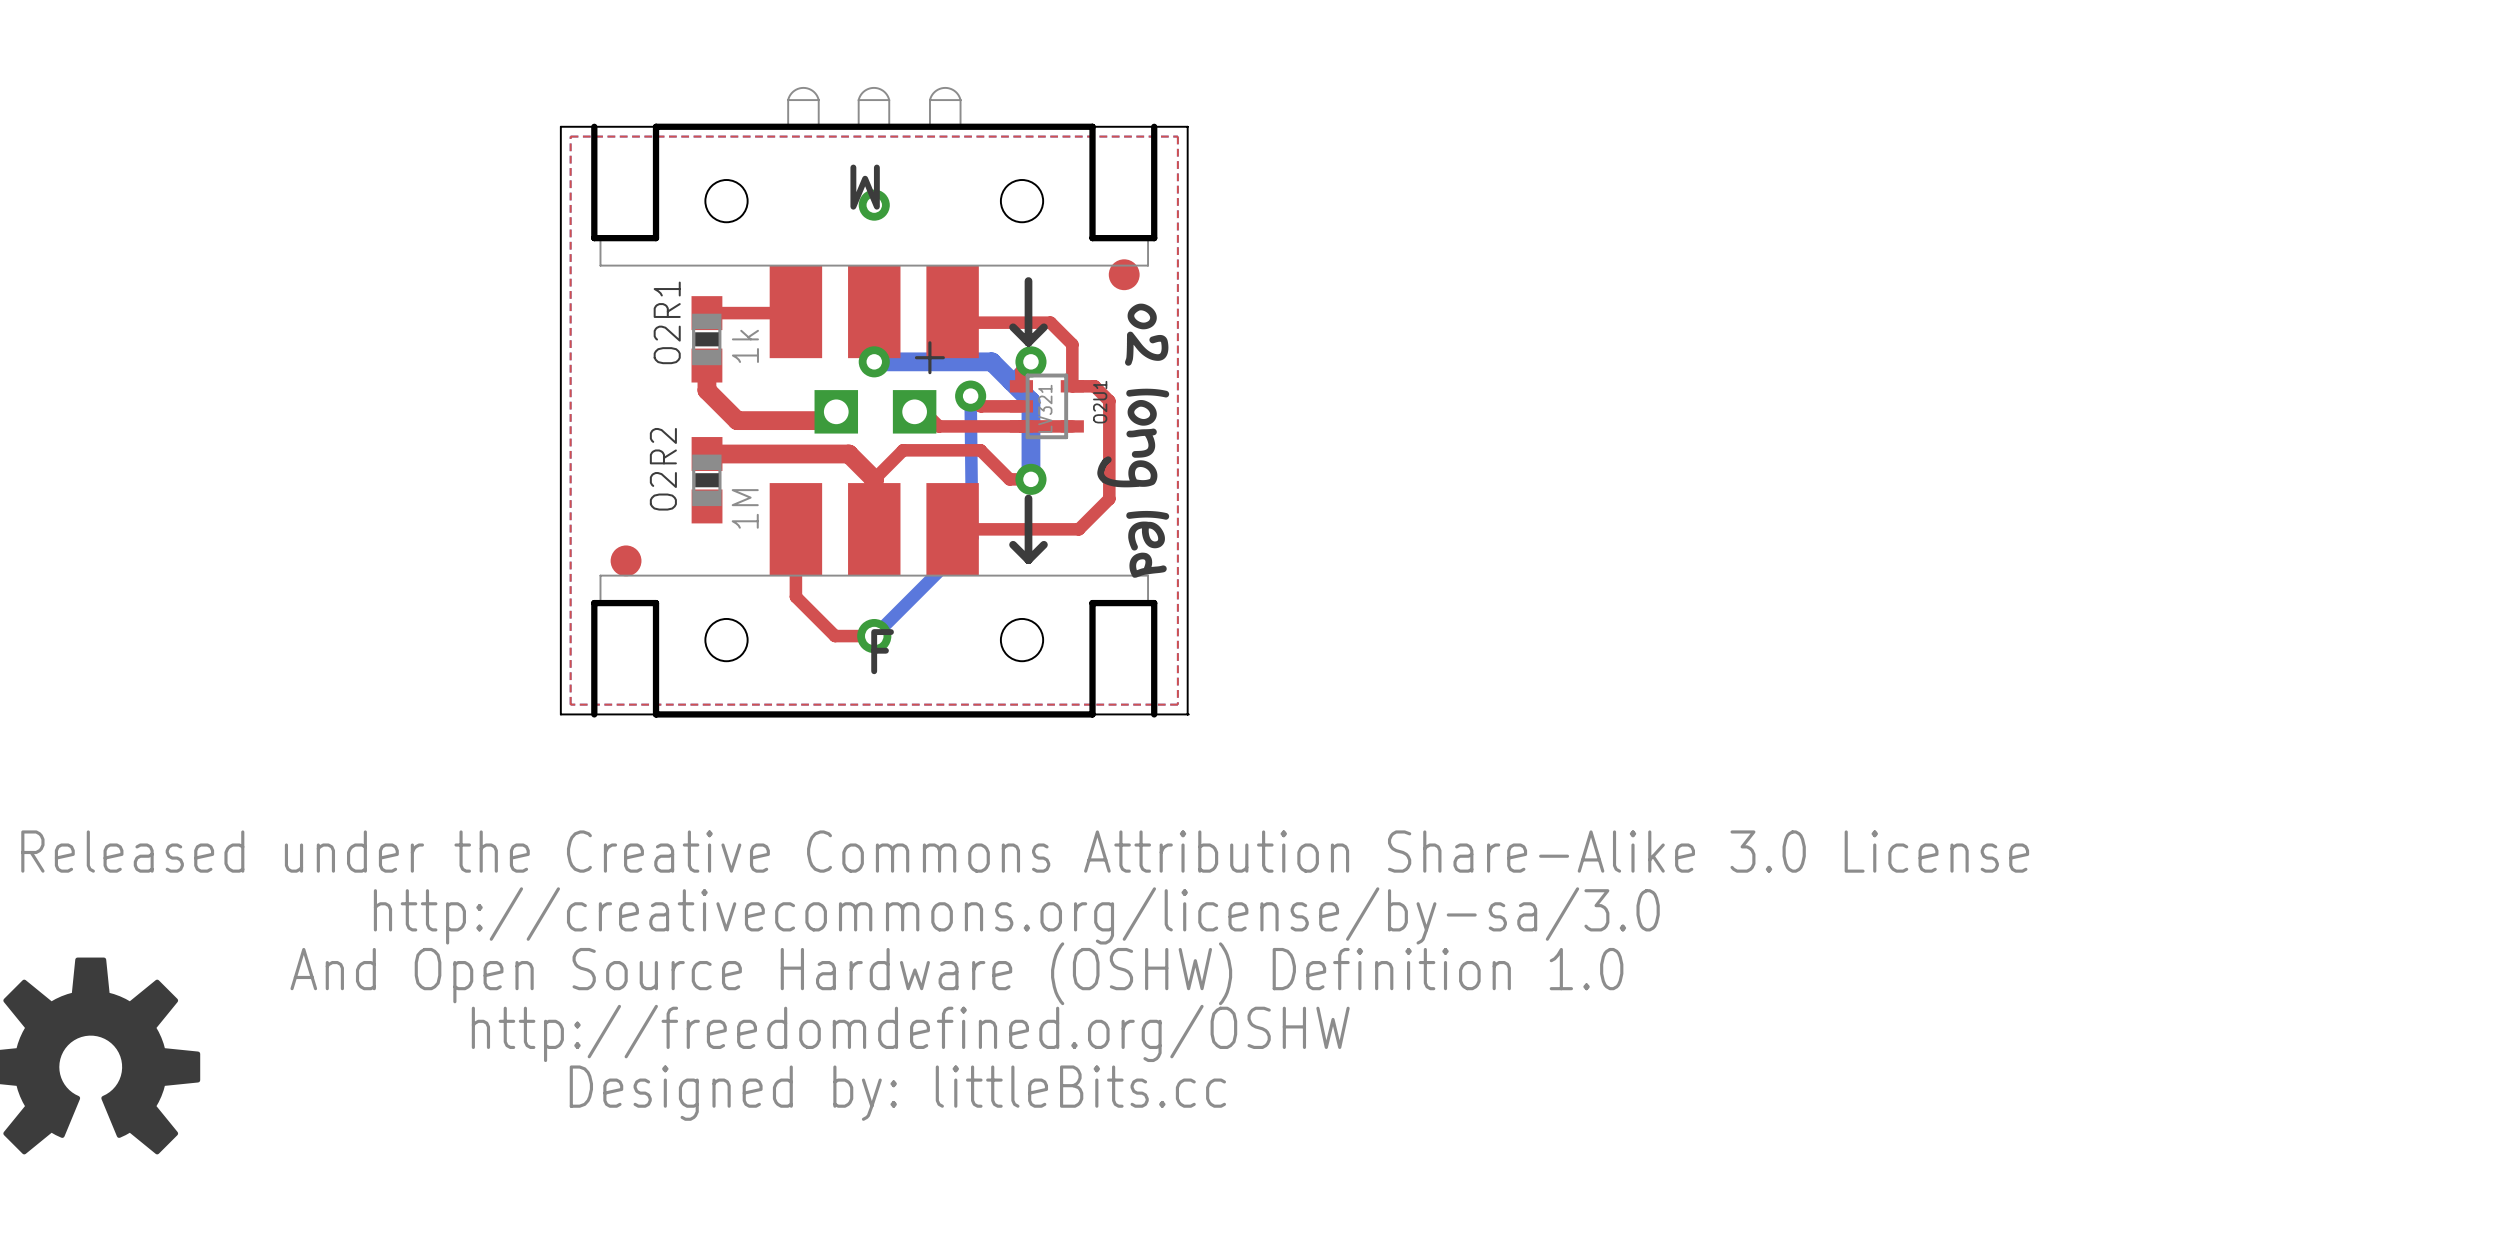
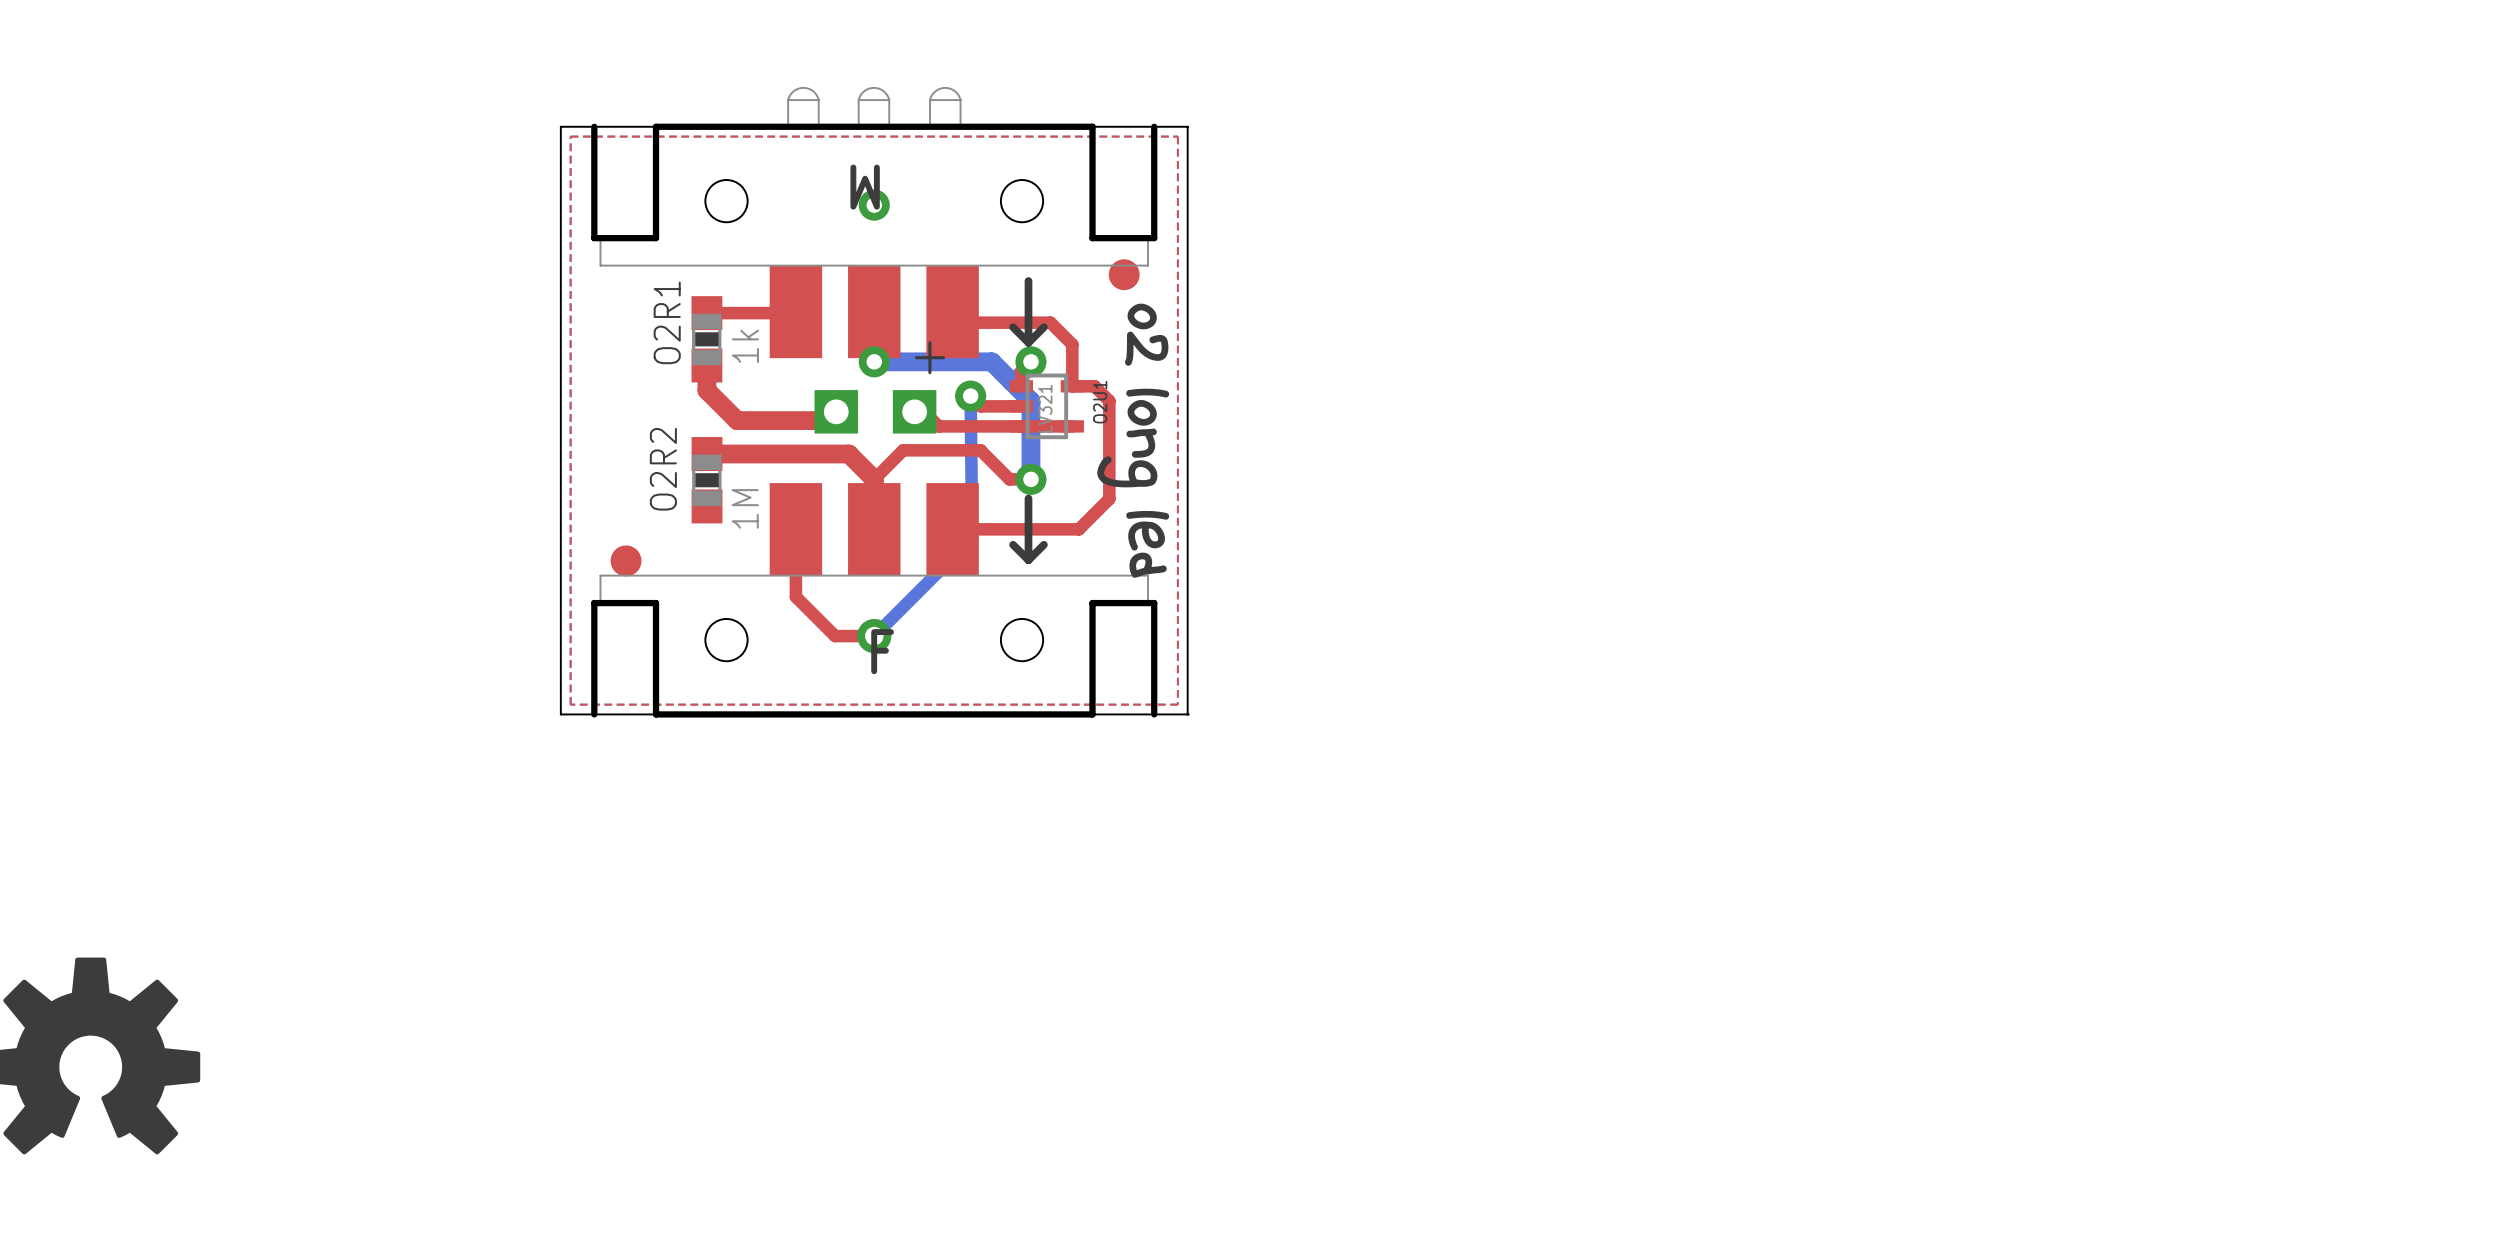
drawing: [21, 830, 2030, 1121] -> none

